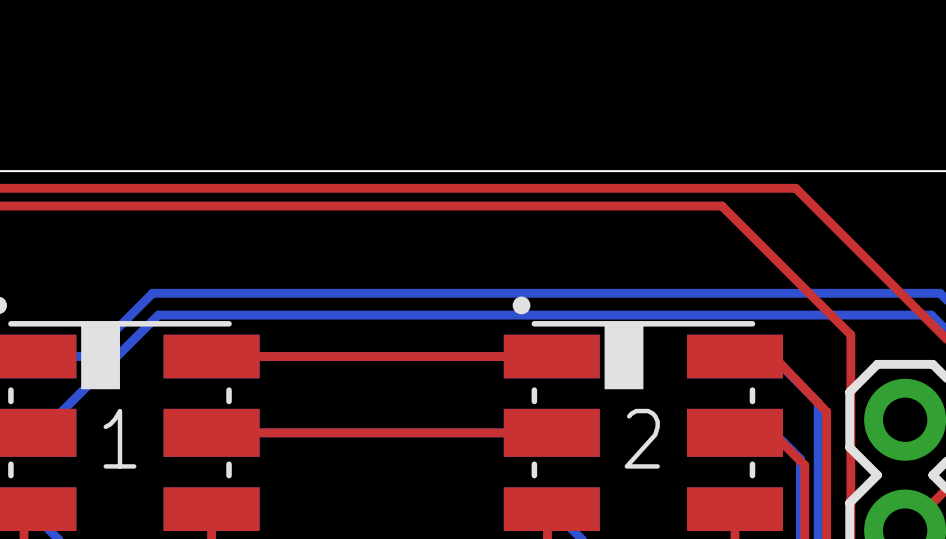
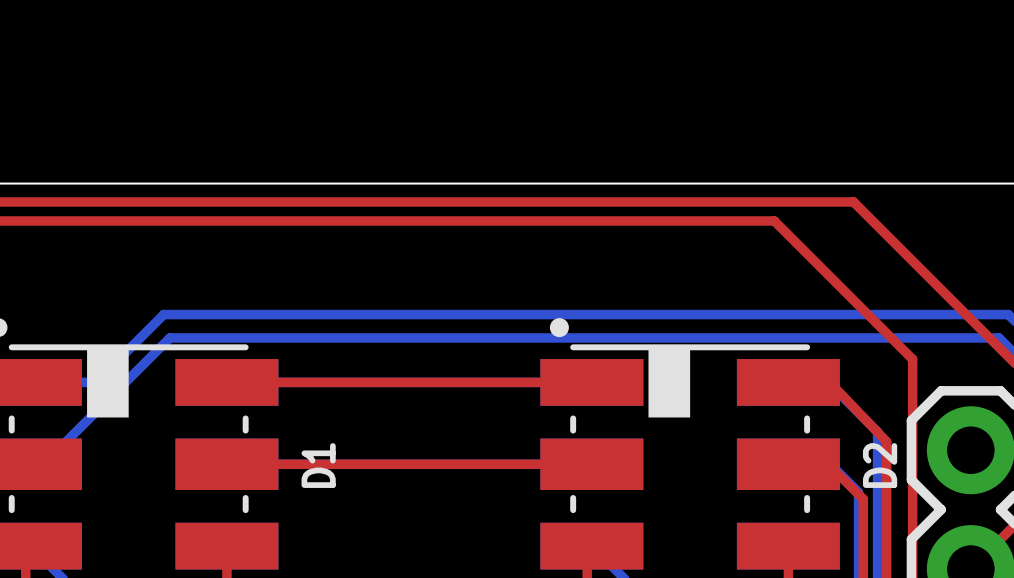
1 name: 1 (119, 438) -> D1 (318, 465)
2 name: 2 (642, 438) -> D2 (880, 465)

